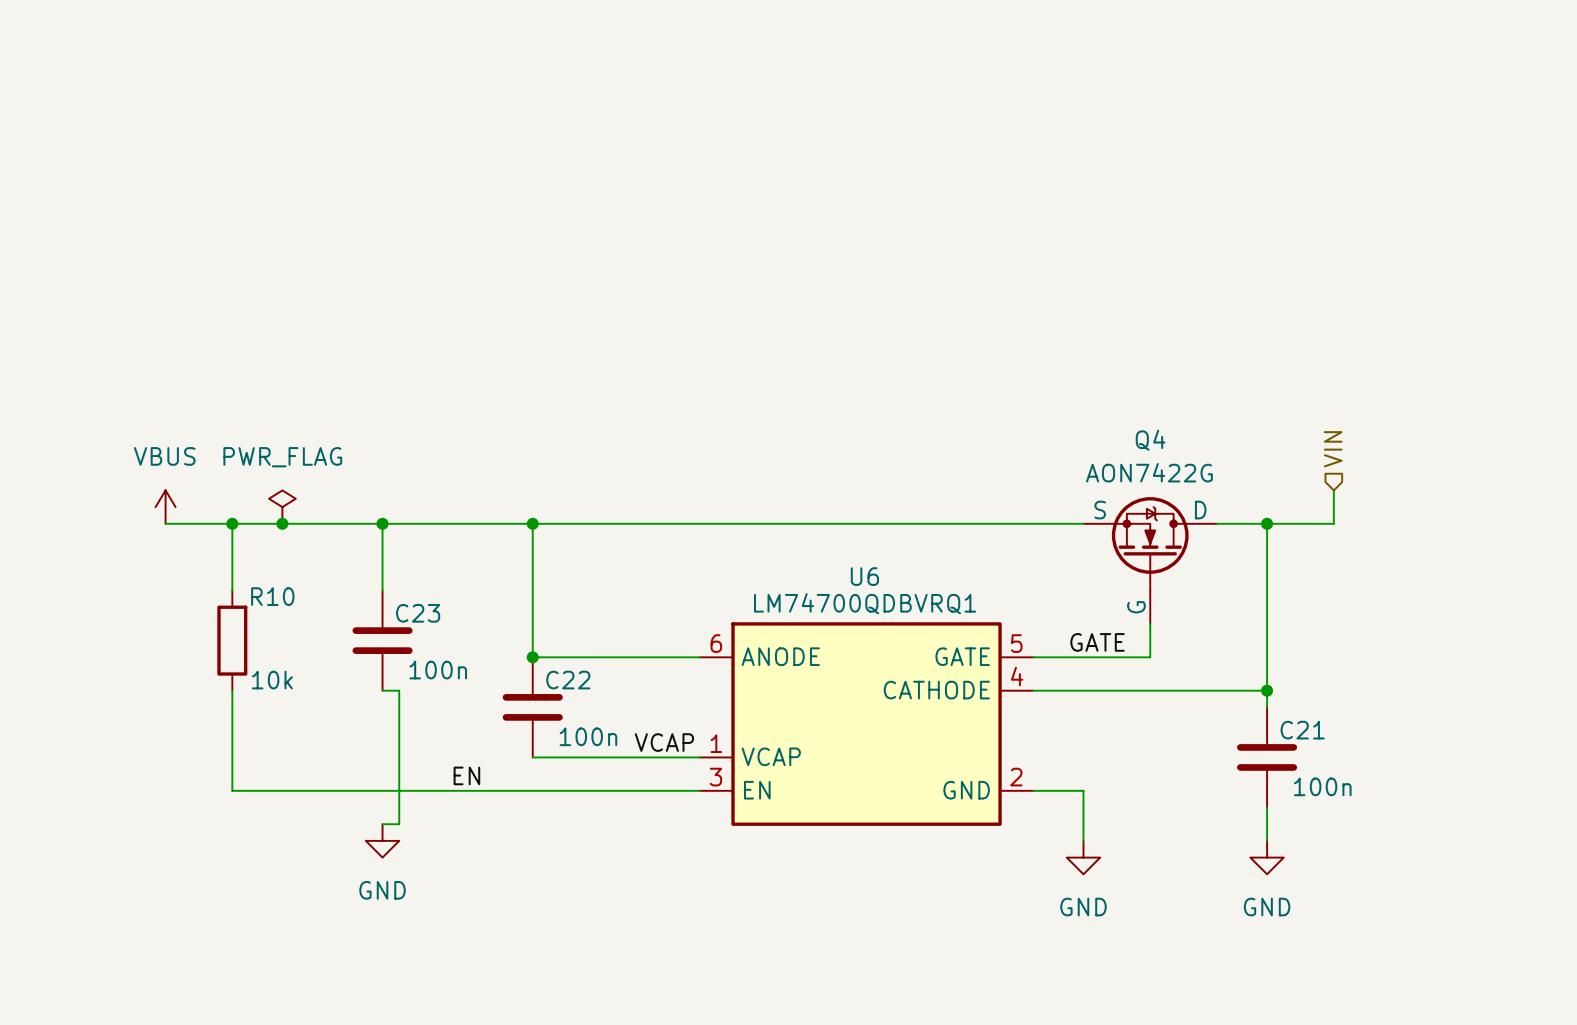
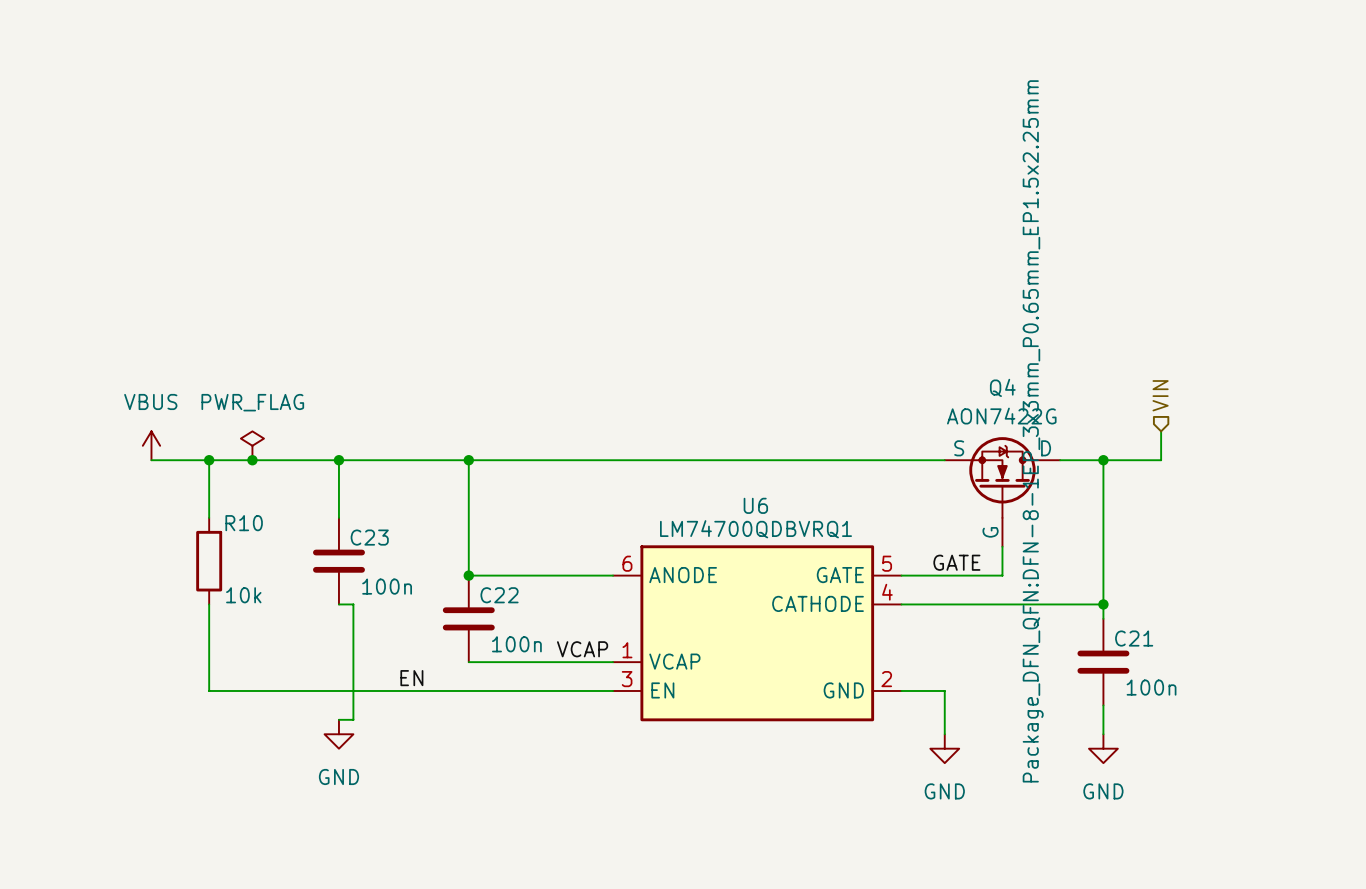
Q4 text: none -> Package_DFN_QFN:DFN-8-1EP_3x3mm_P0.65mm_EP1.5x2.25mm (1033, 431)

